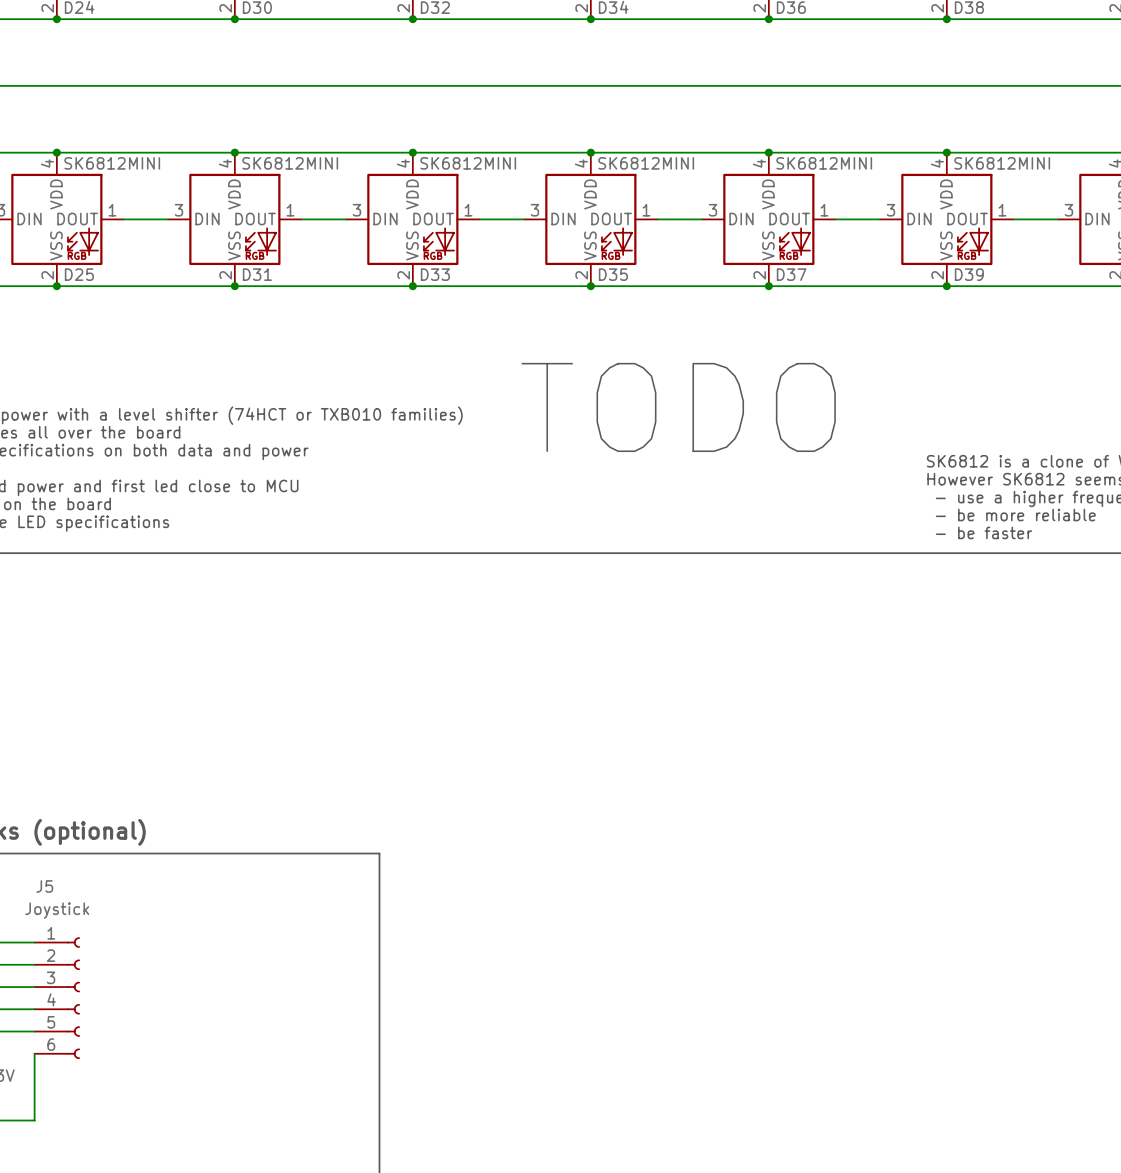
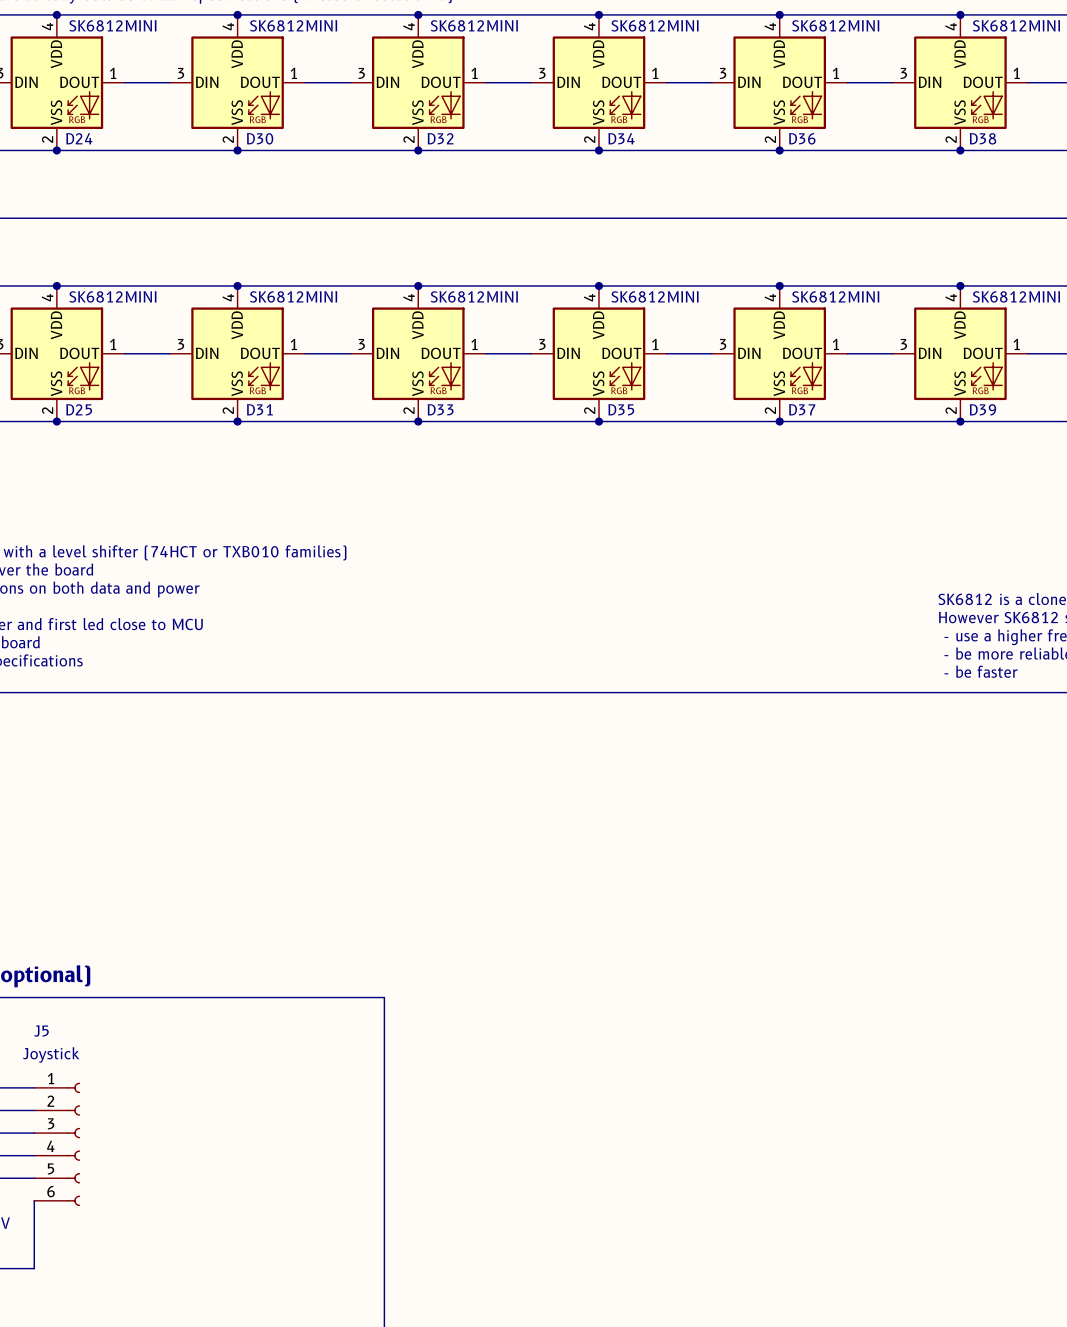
text: TODO (678, 407) -> none

